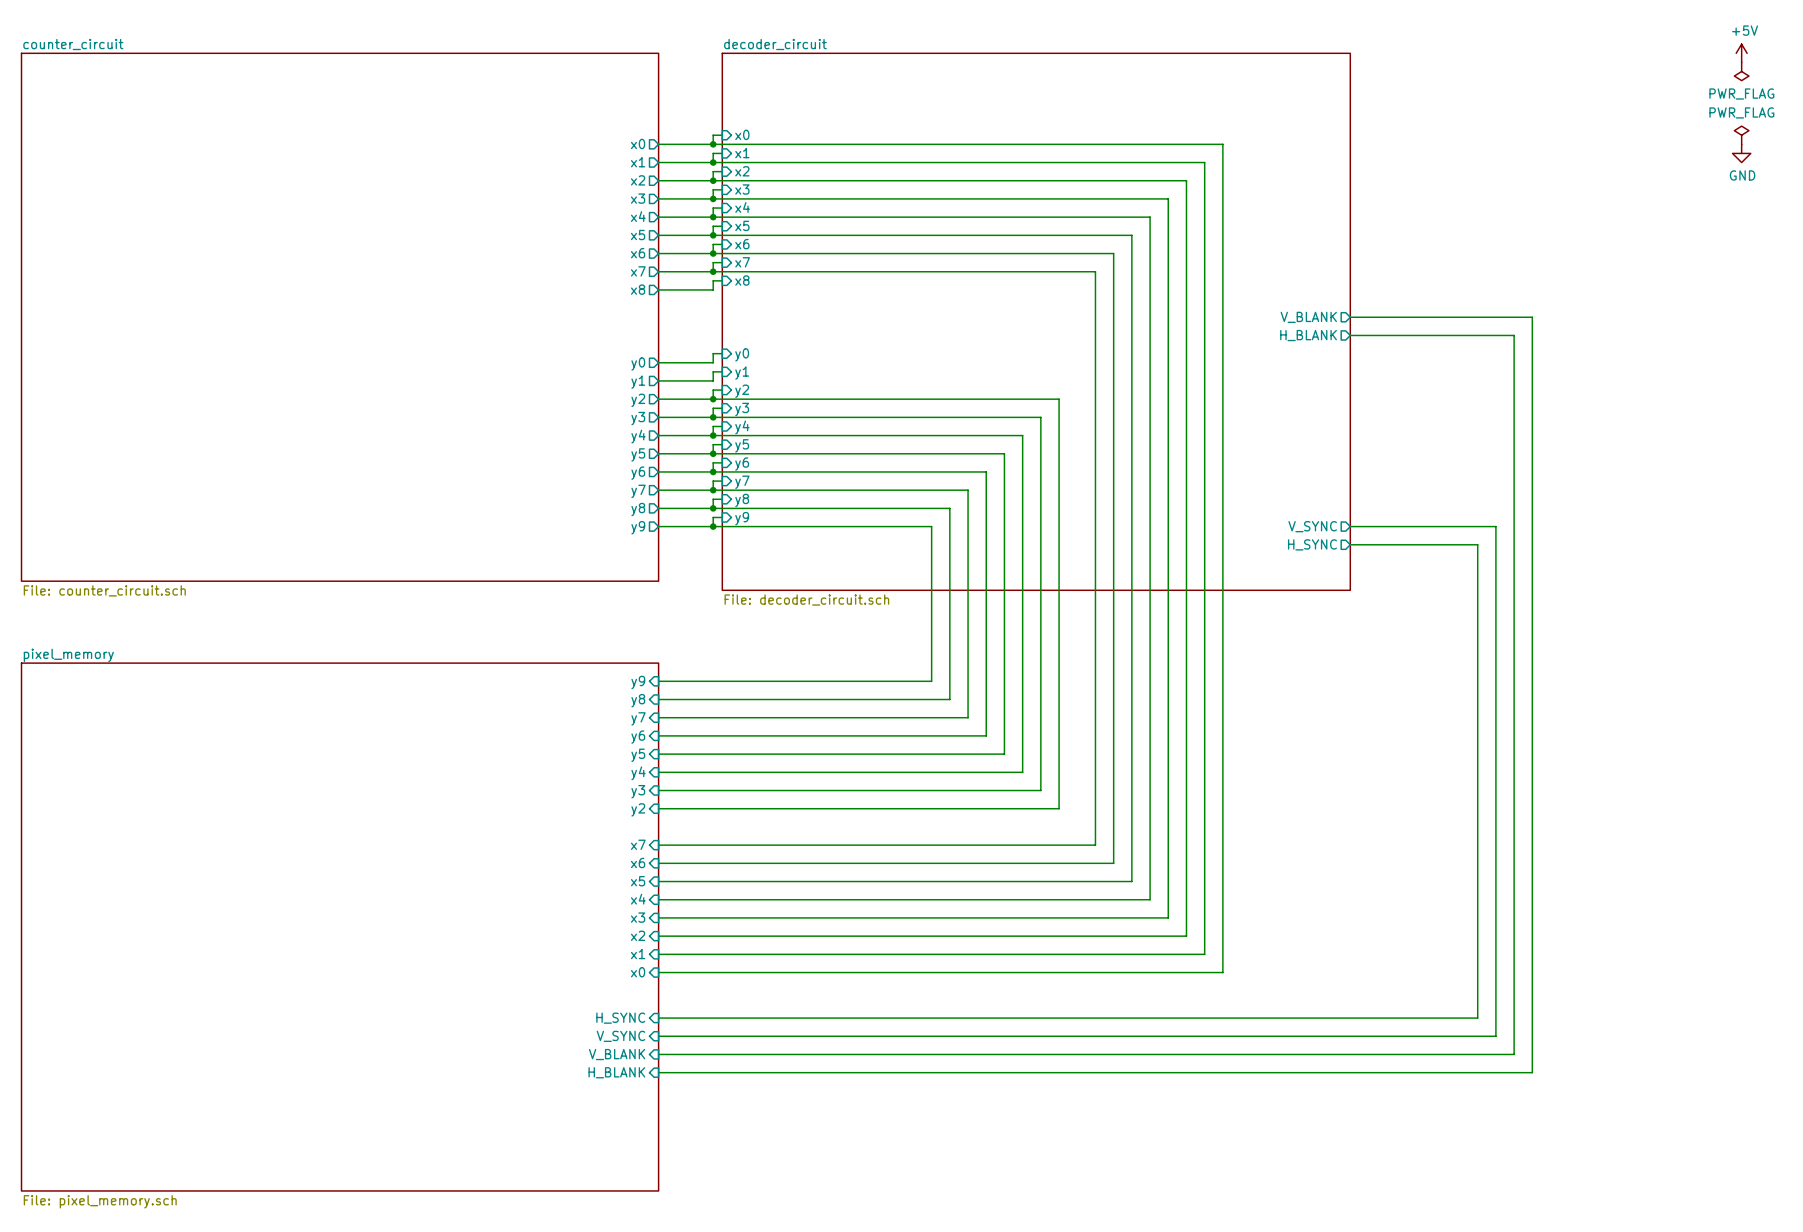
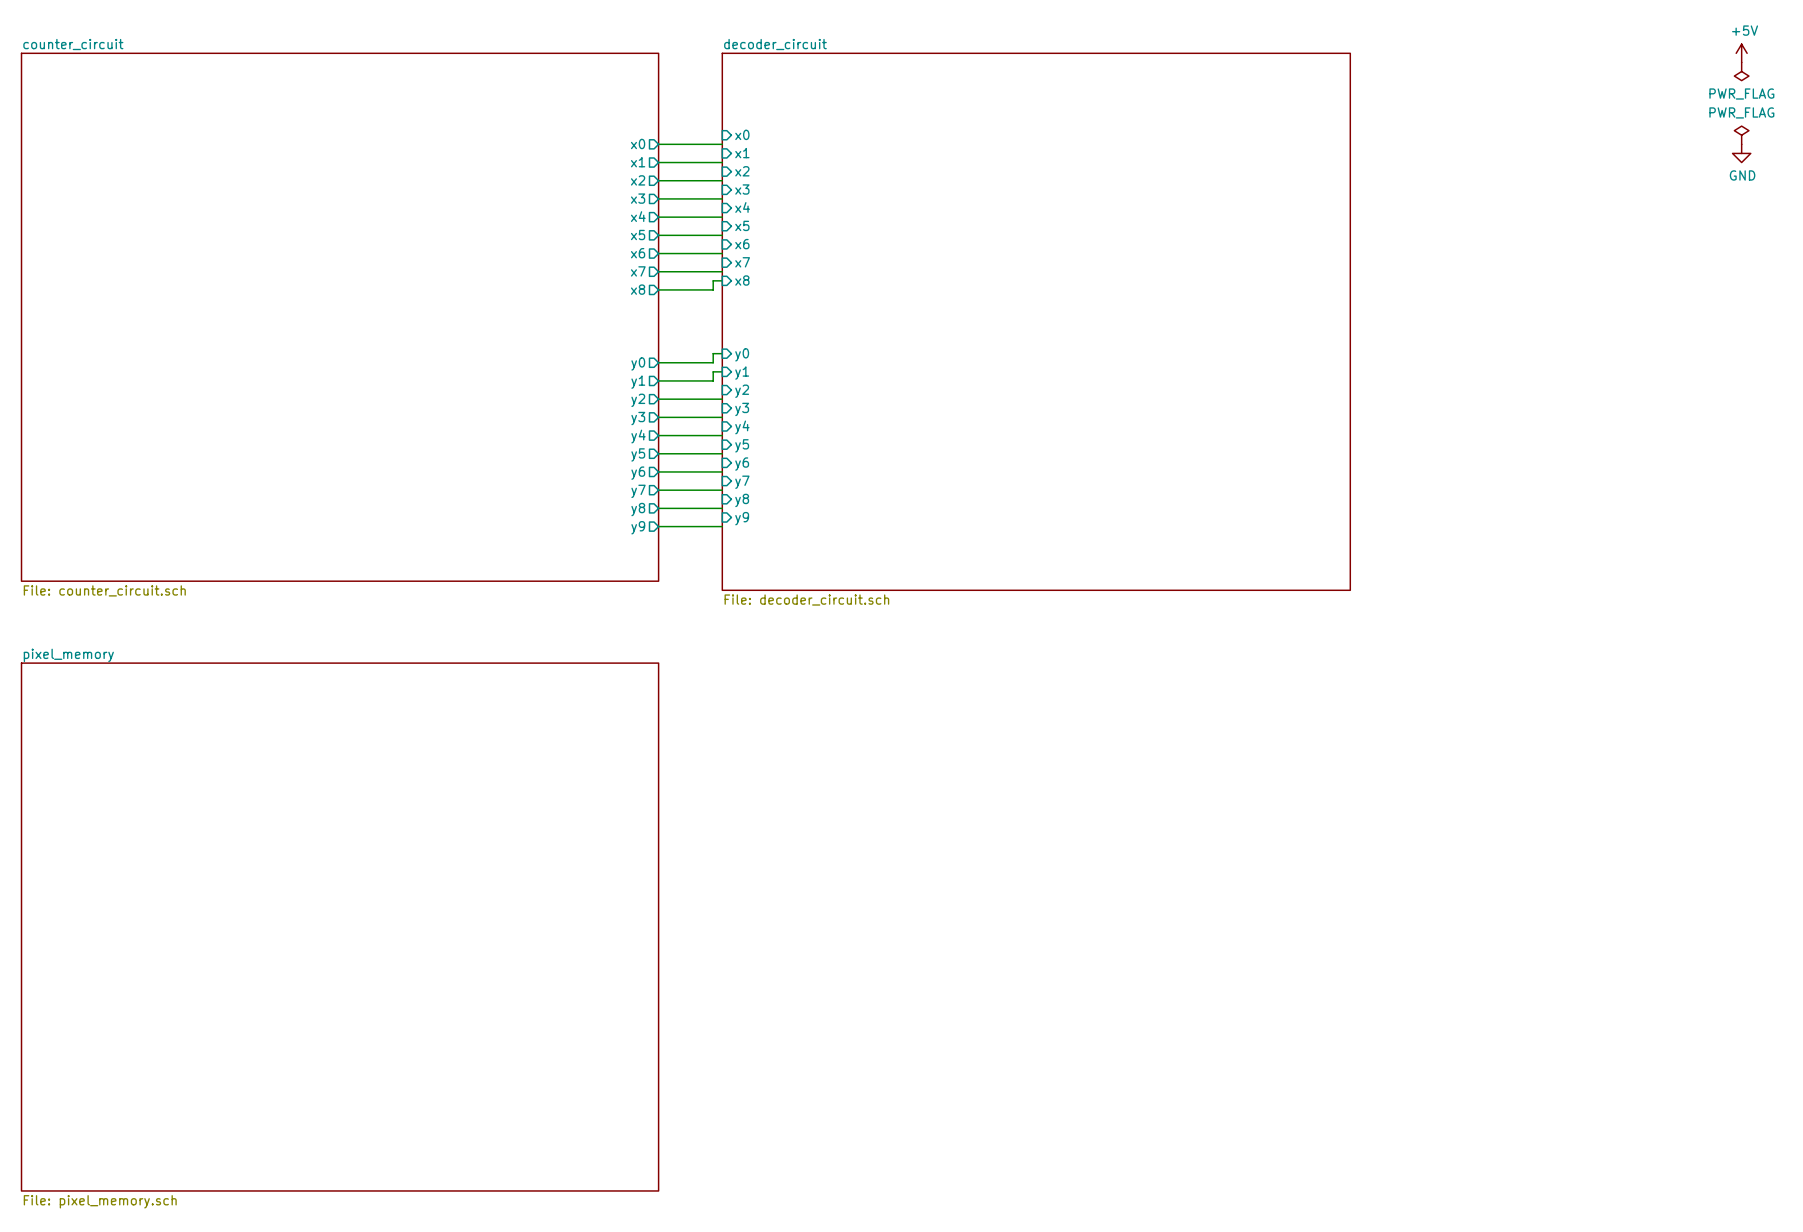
wire: (722, 135) (713, 135) (713, 144) -> none
junction: (713, 144) -> none
wire: (722, 144) (1222, 144) (1222, 972) (658, 972) -> none
wire: (722, 153) (713, 153) (713, 162) -> none
junction: (713, 162) -> none
wire: (722, 162) (1204, 162) (1204, 954) (658, 954) -> none
wire: (722, 171) (713, 171) (713, 180) -> none
junction: (713, 180) -> none
wire: (722, 180) (1186, 180) (1186, 936) (658, 936) -> none
wire: (722, 189) (713, 189) (713, 198) -> none
junction: (713, 198) -> none
wire: (722, 198) (1168, 198) (1168, 917) (658, 917) -> none
wire: (722, 208) (713, 208) (713, 217) -> none
junction: (713, 217) -> none
wire: (722, 217) (1150, 217) (1150, 899) (658, 899) -> none
wire: (722, 226) (713, 226) (713, 235) -> none
junction: (713, 235) -> none
wire: (722, 235) (1131, 235) (1131, 881) (658, 881) -> none
wire: (722, 244) (713, 244) (713, 253) -> none
junction: (713, 253) -> none
wire: (722, 253) (1113, 253) (1113, 863) (658, 863) -> none
wire: (722, 262) (713, 262) (713, 271) -> none
junction: (713, 271) -> none
wire: (722, 271) (1095, 271) (1095, 845) (658, 845) -> none
sheet pin: V_BLANK (1308, 317) -> none
wire: (1350, 317) (1532, 317) (1532, 1072) (658, 1072) -> none
sheet pin: H_BLANK (1308, 335) -> none
wire: (1350, 335) (1514, 335) (1514, 1054) (658, 1054) -> none
wire: (722, 390) (713, 390) (713, 399) -> none
junction: (713, 399) -> none
wire: (722, 399) (1059, 399) (1059, 808) (658, 808) -> none
wire: (722, 408) (713, 408) (713, 417) -> none
junction: (713, 417) -> none
wire: (722, 417) (1040, 417) (1040, 790) (658, 790) -> none
wire: (722, 426) (713, 426) (713, 435) -> none
junction: (713, 435) -> none
wire: (722, 435) (1022, 435) (1022, 772) (658, 772) -> none
wire: (722, 444) (713, 444) (713, 453) -> none
junction: (713, 453) -> none
wire: (722, 453) (1004, 453) (1004, 754) (658, 754) -> none
wire: (722, 462) (713, 462) (713, 471) -> none
junction: (713, 471) -> none
wire: (722, 471) (986, 471) (986, 735) (658, 735) -> none
wire: (722, 481) (713, 481) (713, 490) -> none
junction: (713, 490) -> none
wire: (722, 490) (968, 490) (968, 717) (658, 717) -> none
wire: (722, 499) (713, 499) (713, 508) -> none
junction: (713, 508) -> none
wire: (722, 508) (949, 508) (949, 699) (658, 699) -> none
wire: (722, 517) (713, 517) (713, 526) -> none
junction: (713, 526) -> none
wire: (722, 526) (931, 526) (931, 681) (658, 681) -> none
sheet pin: V_SYNC (1312, 526) -> none
wire: (1350, 526) (1495, 526) (1495, 1036) (658, 1036) -> none
sheet pin: H_SYNC (1312, 544) -> none
wire: (1350, 544) (1477, 544) (1477, 1018) (658, 1018) -> none
sheet pin: y9 (638, 682) -> none
sheet pin: y8 (638, 700) -> none
sheet pin: y7 (638, 718) -> none
sheet pin: y6 (638, 737) -> none
sheet pin: y5 (638, 755) -> none
sheet pin: y4 (638, 773) -> none
sheet pin: y3 (638, 791) -> none
sheet pin: y2 (638, 809) -> none
sheet pin: x7 (638, 844) -> none
sheet pin: x6 (638, 862) -> none
sheet pin: x5 (638, 881) -> none
sheet pin: x4 (638, 899) -> none
sheet pin: x3 (638, 917) -> none
sheet pin: x2 (638, 935) -> none
sheet pin: x1 (638, 954) -> none
sheet pin: x0 (638, 972) -> none
sheet pin: H_SYNC (620, 1018) -> none
sheet pin: V_SYNC (620, 1036) -> none
sheet pin: V_BLANK (617, 1054) -> none
sheet pin: H_BLANK (616, 1072) -> none

